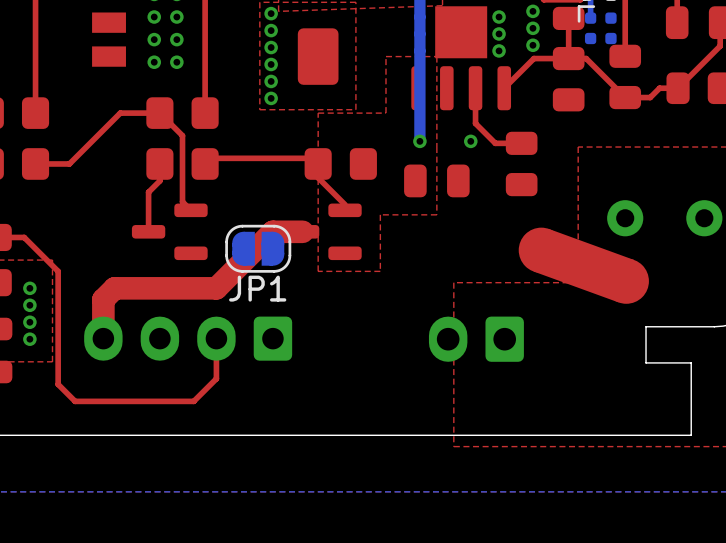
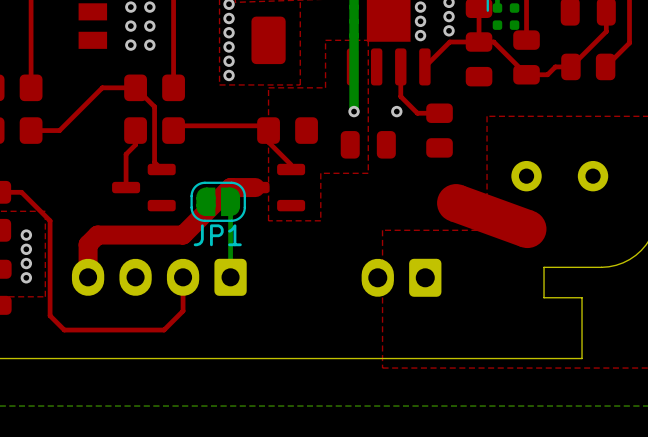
bottom track: none -> (231, 197) (230, 277)

